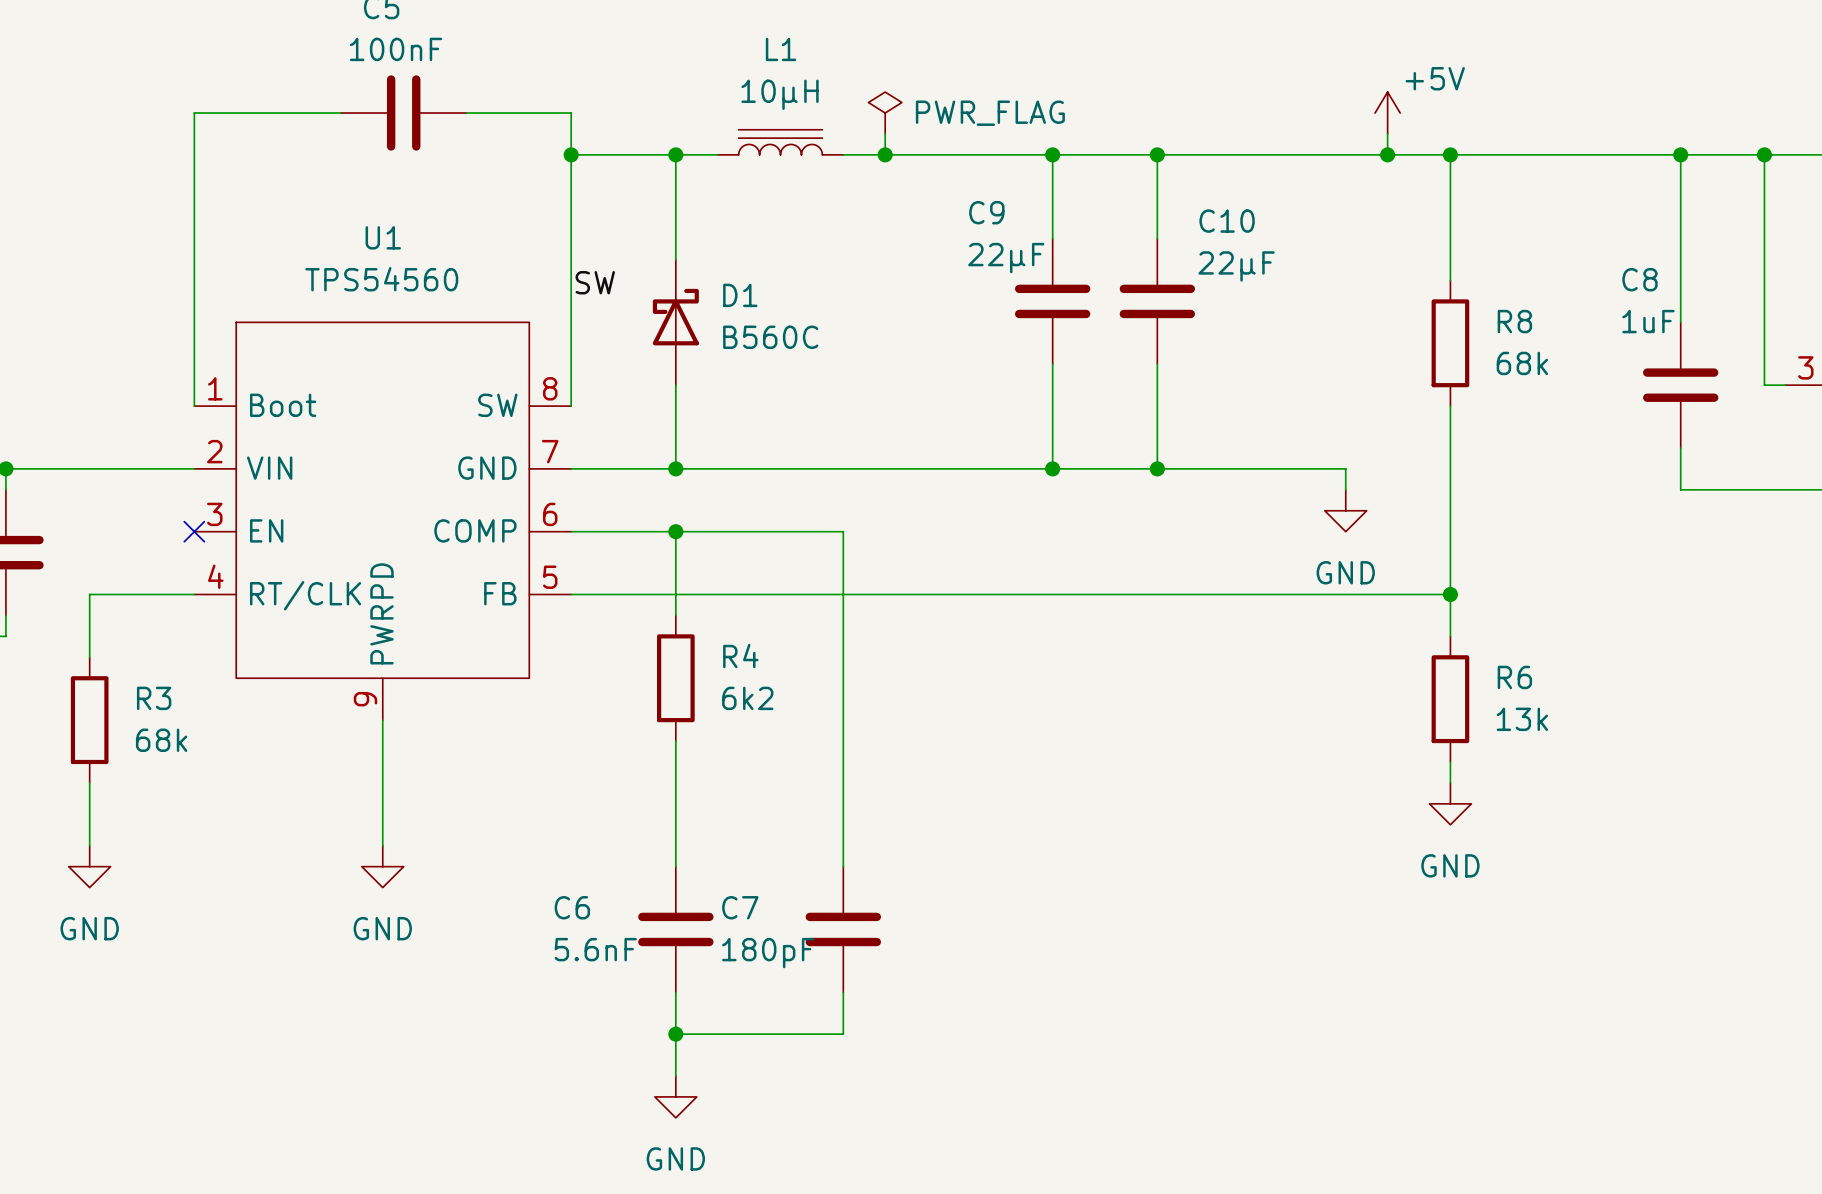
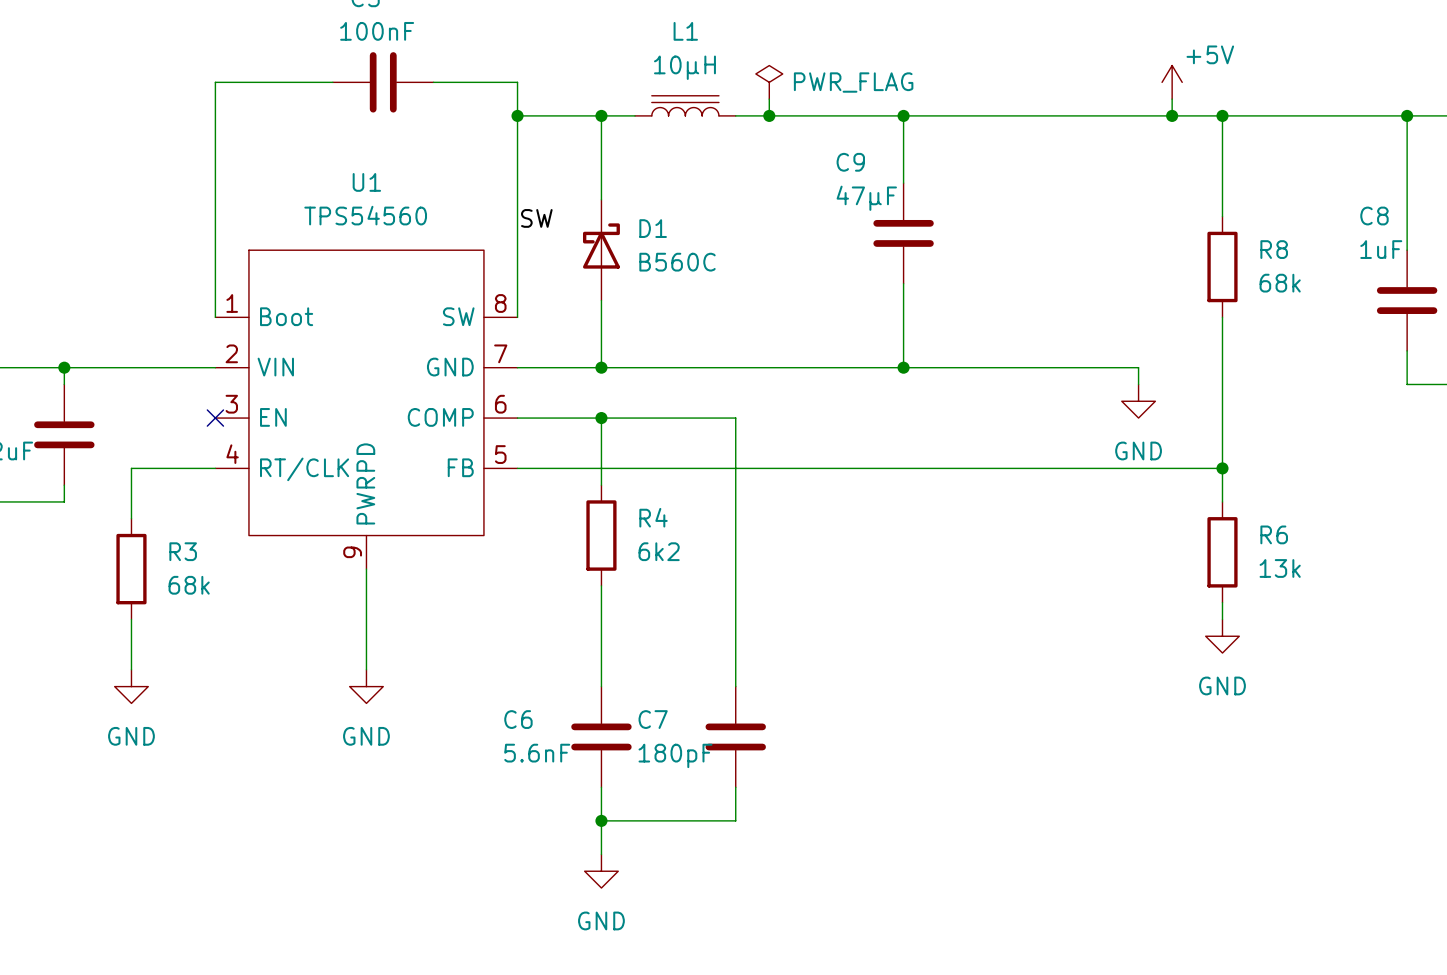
wire: (1157, 154) (1157, 238) -> none
junction: (1157, 154) -> none
C9 value: 22μF (1006, 258) -> 47μF (866, 198)
C10: 22μF (1157, 301) -> none
wire: (1157, 364) (1157, 468) -> none
junction: (1157, 468) -> none

